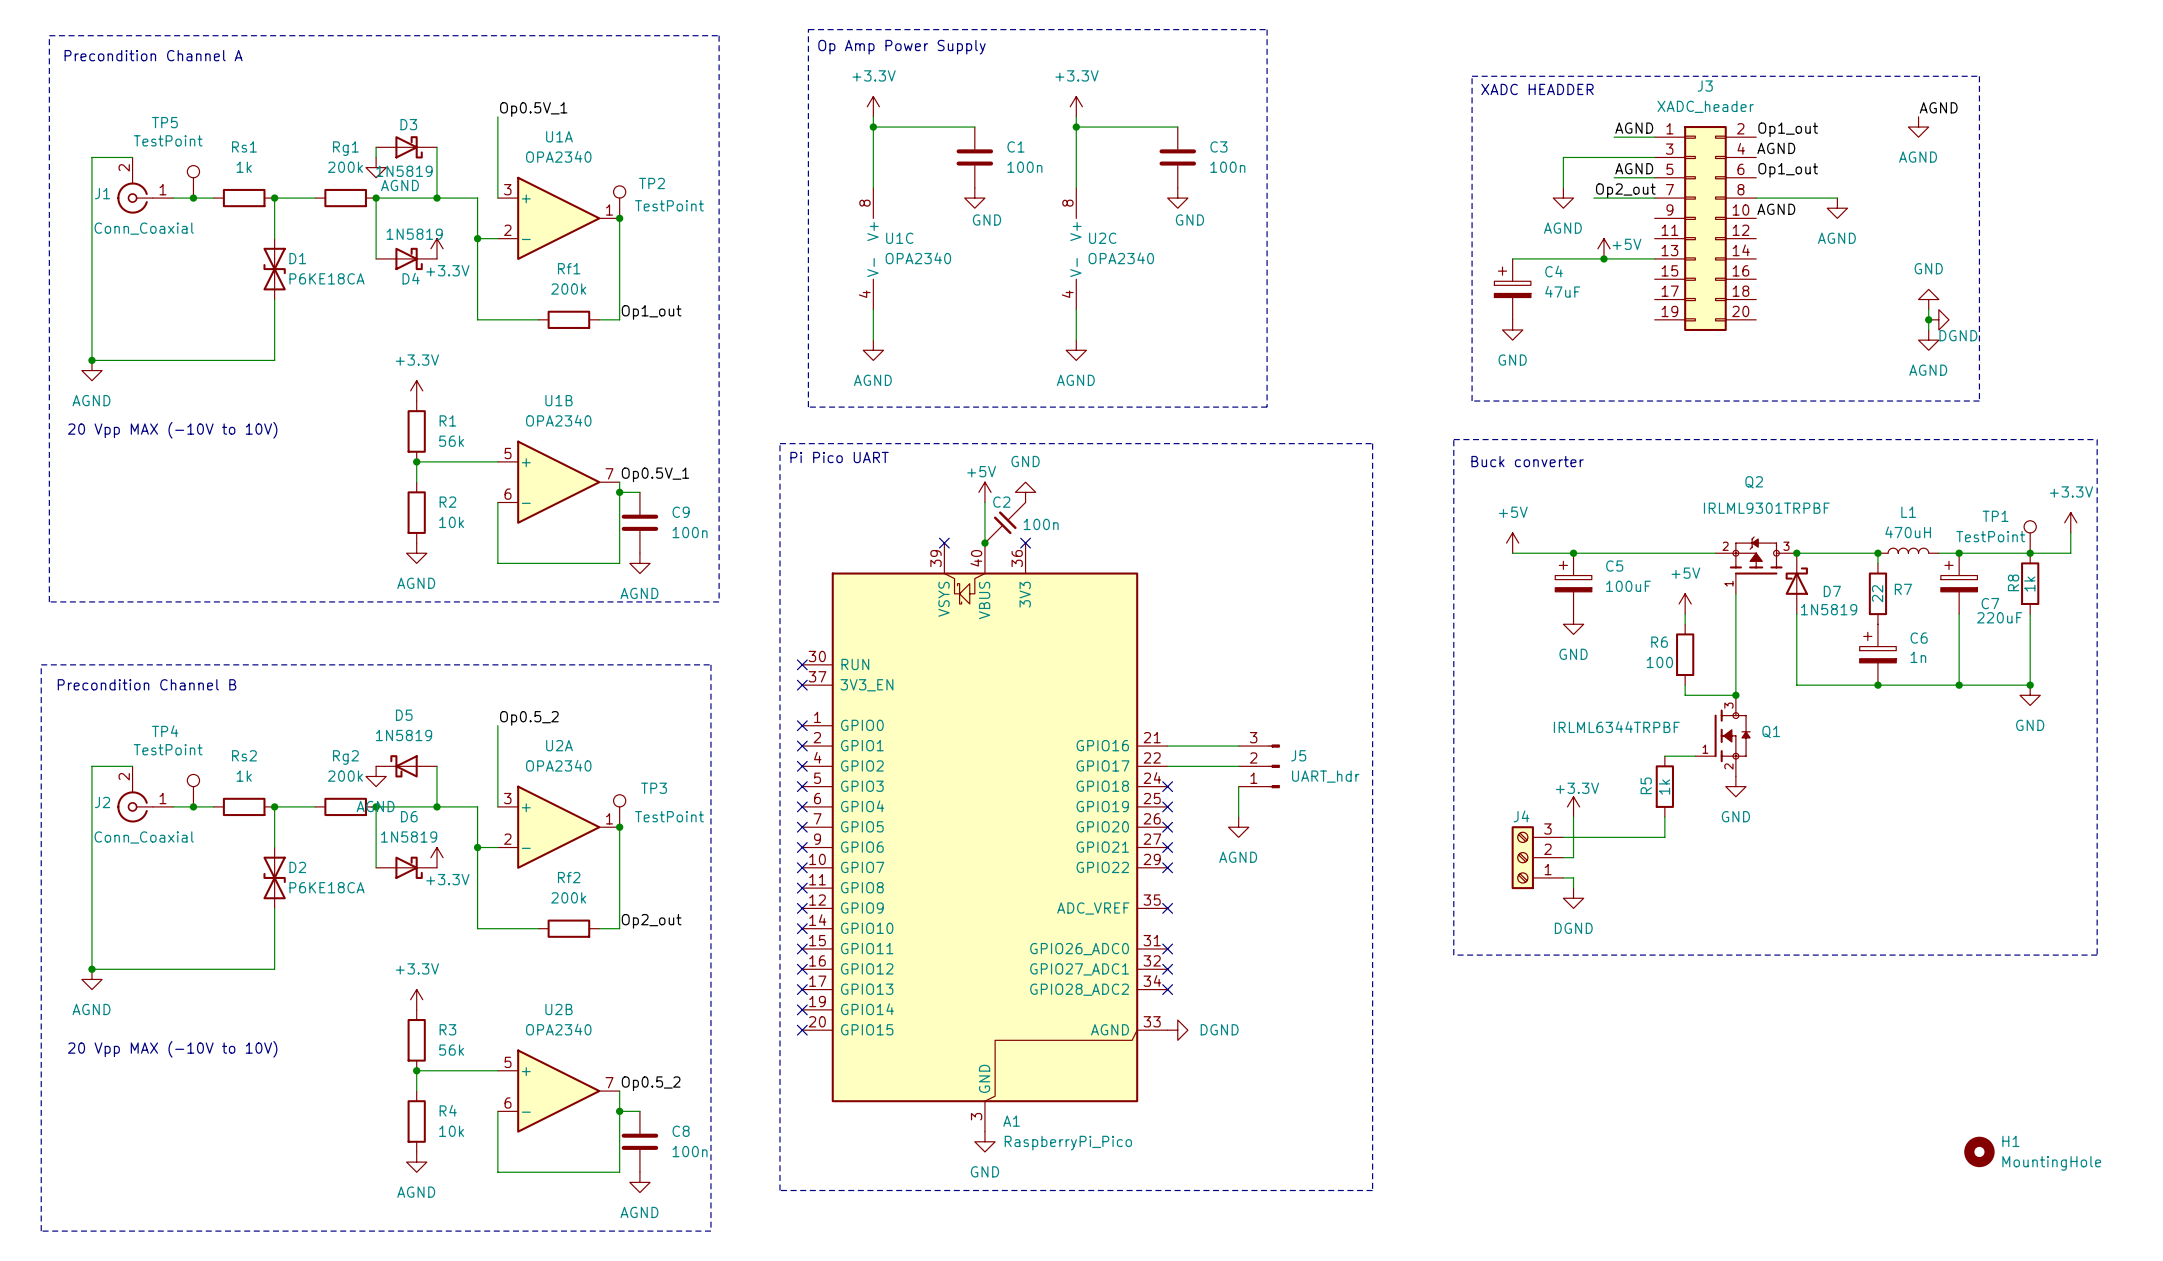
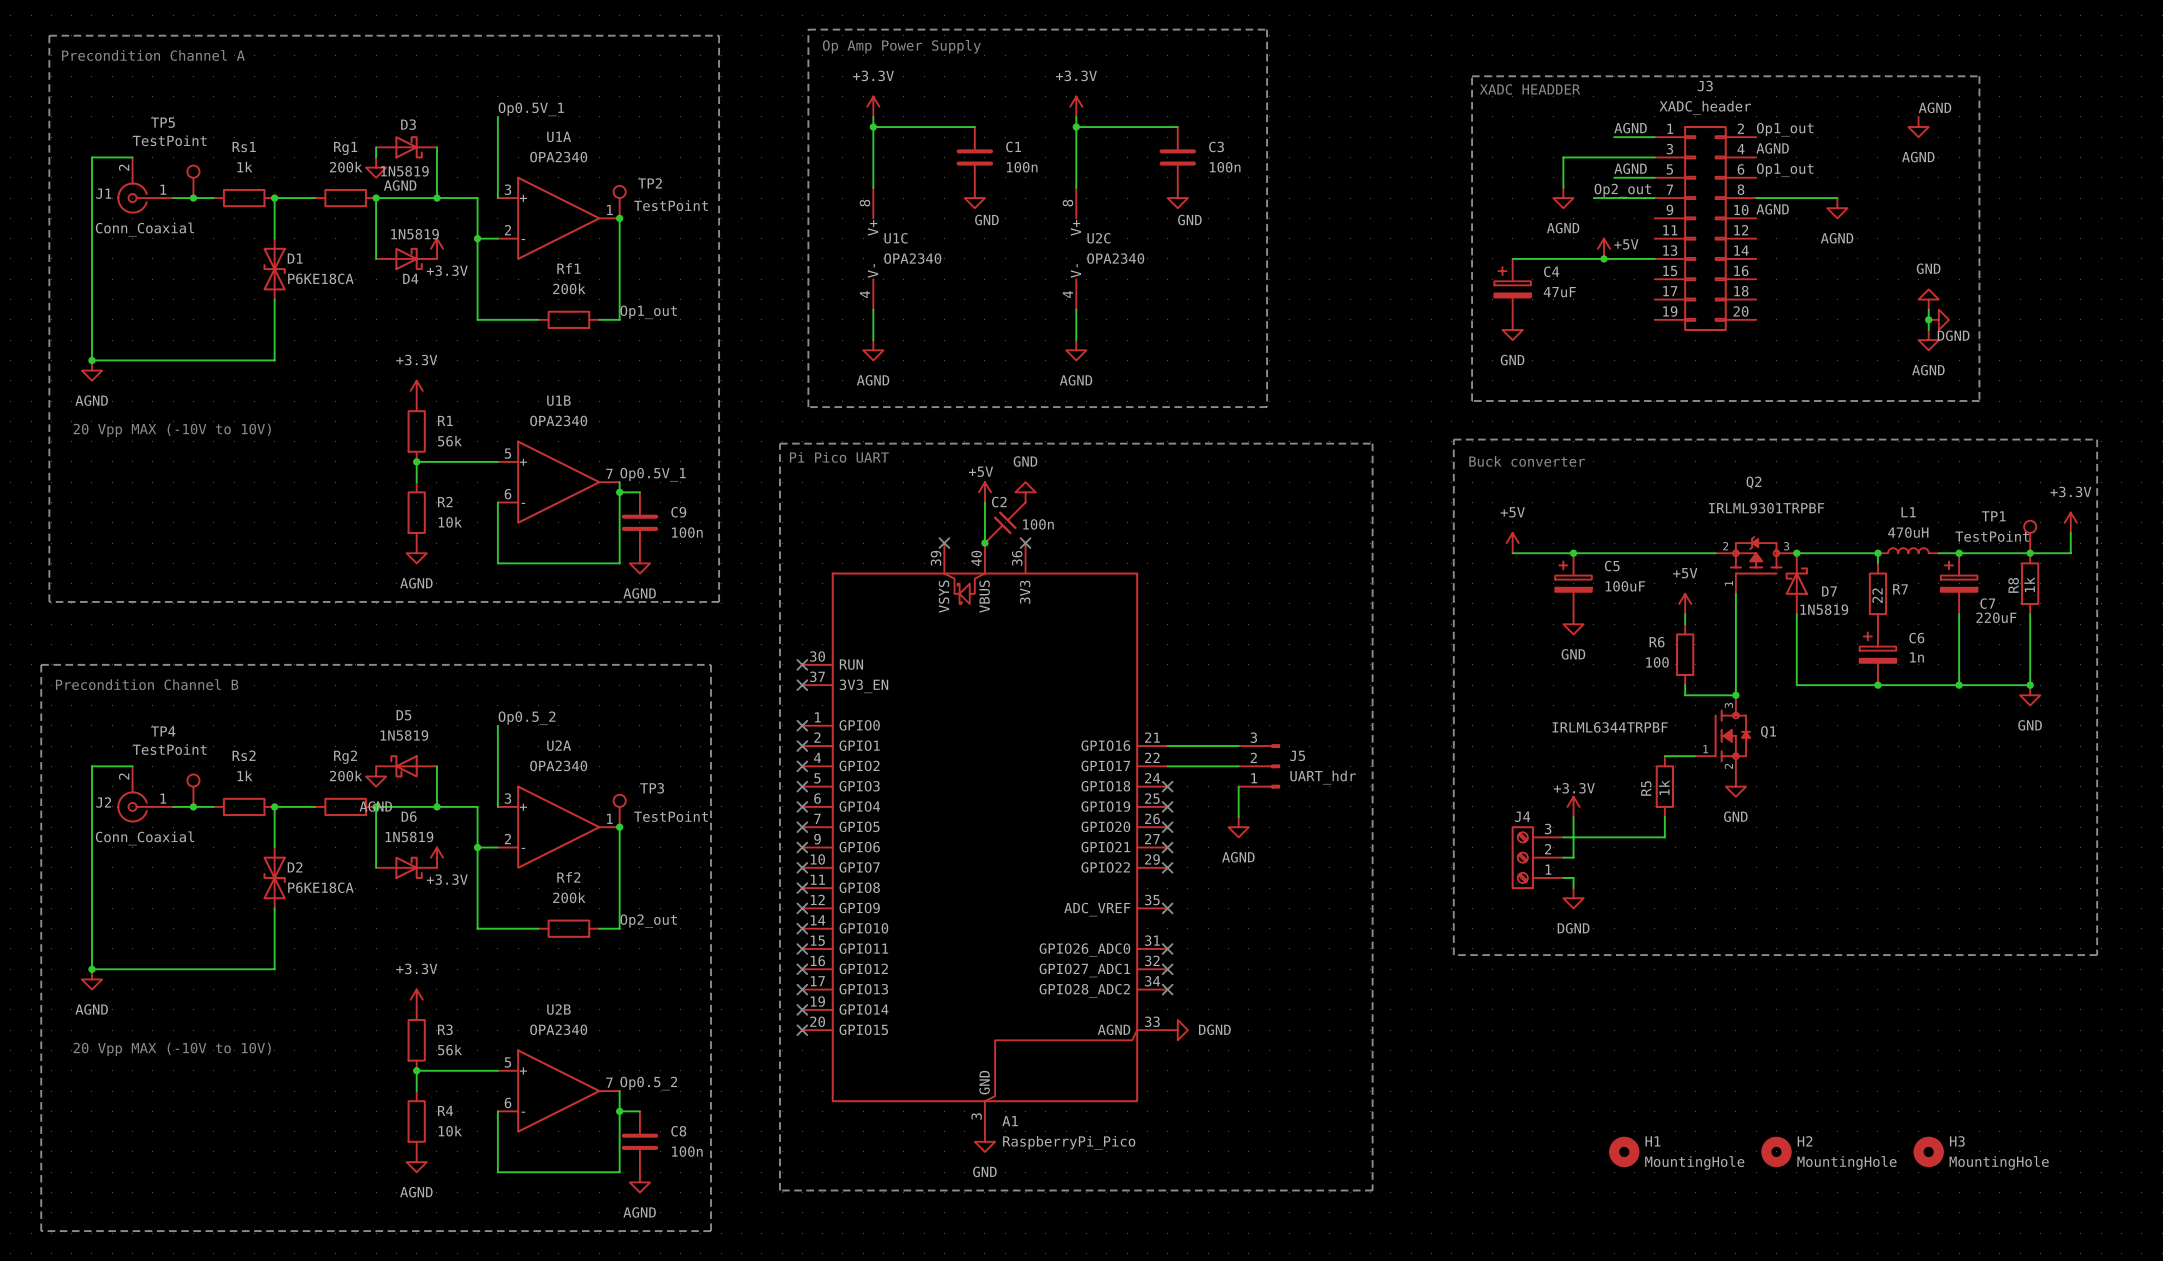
H2: none -> MountingHole (1776, 1151)
H3: none -> MountingHole (1928, 1151)
H1 position: (1979, 1151) -> (1624, 1151)

